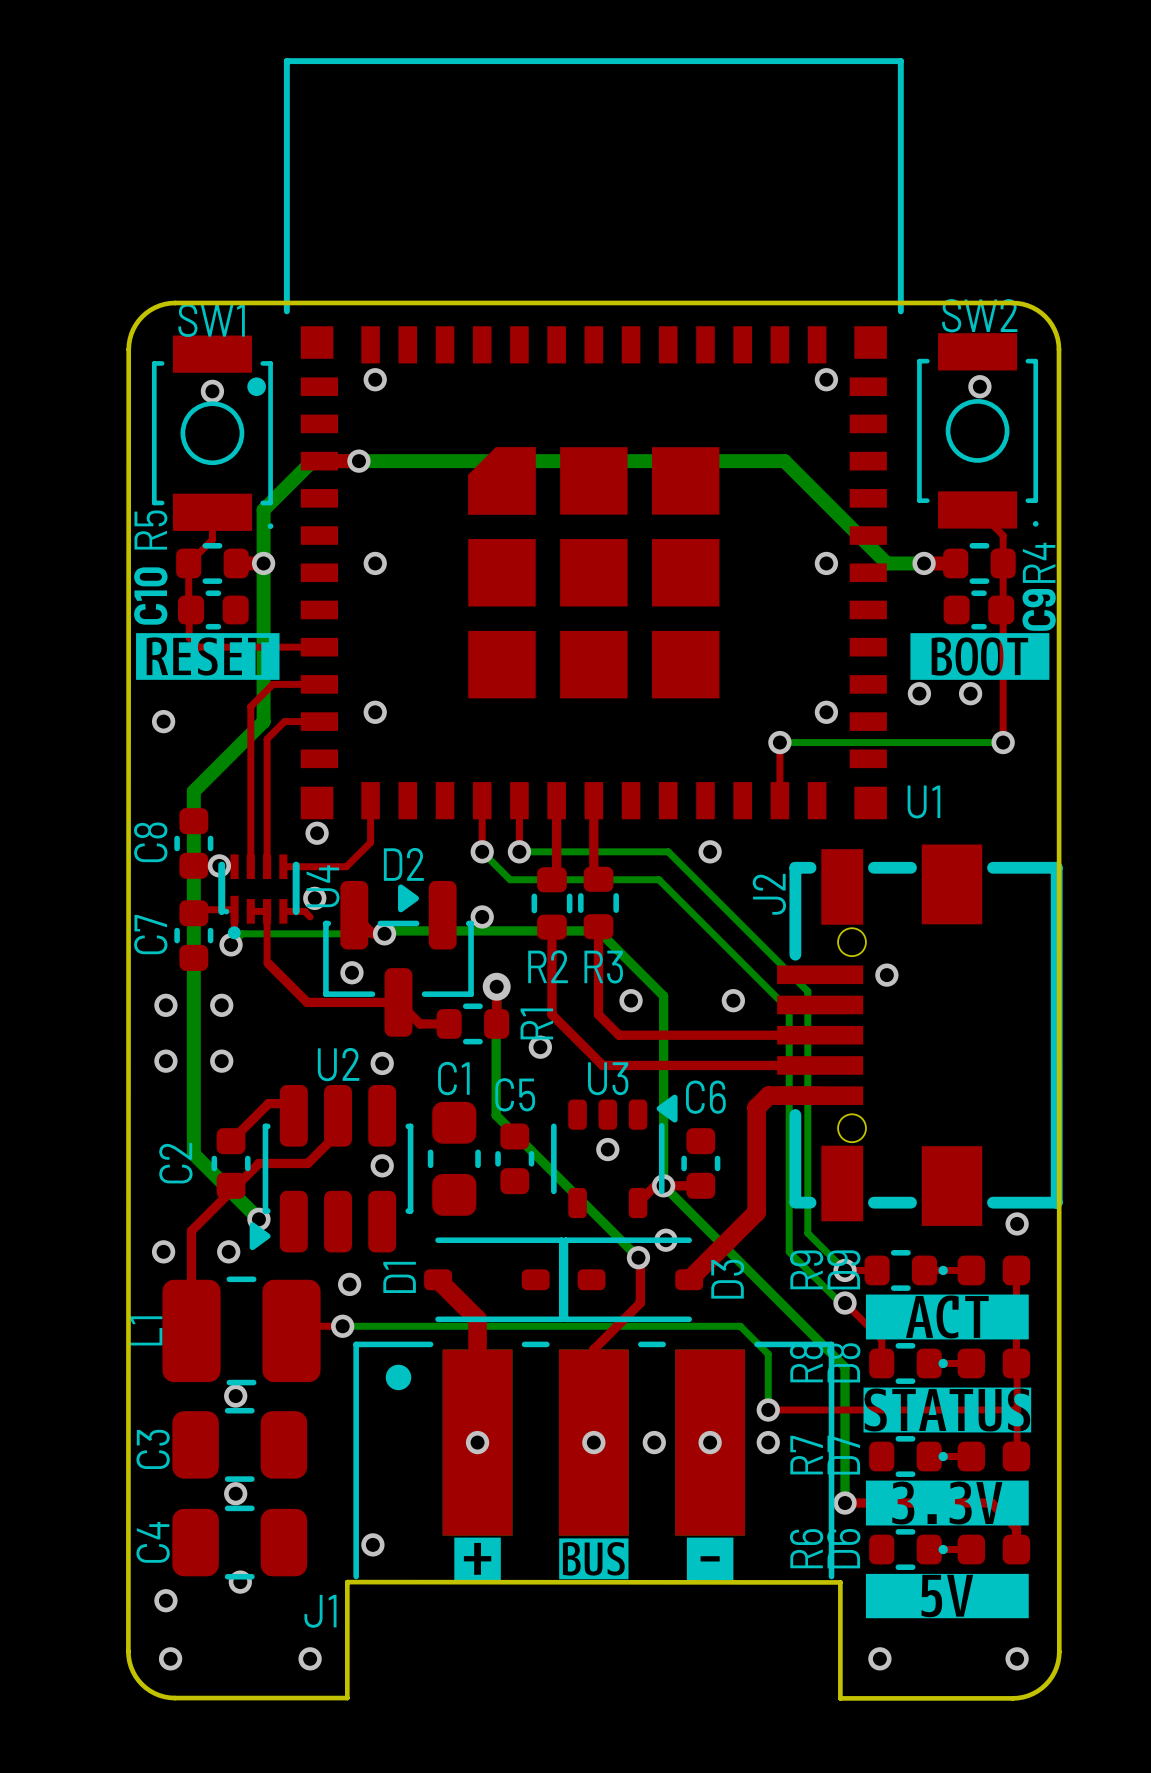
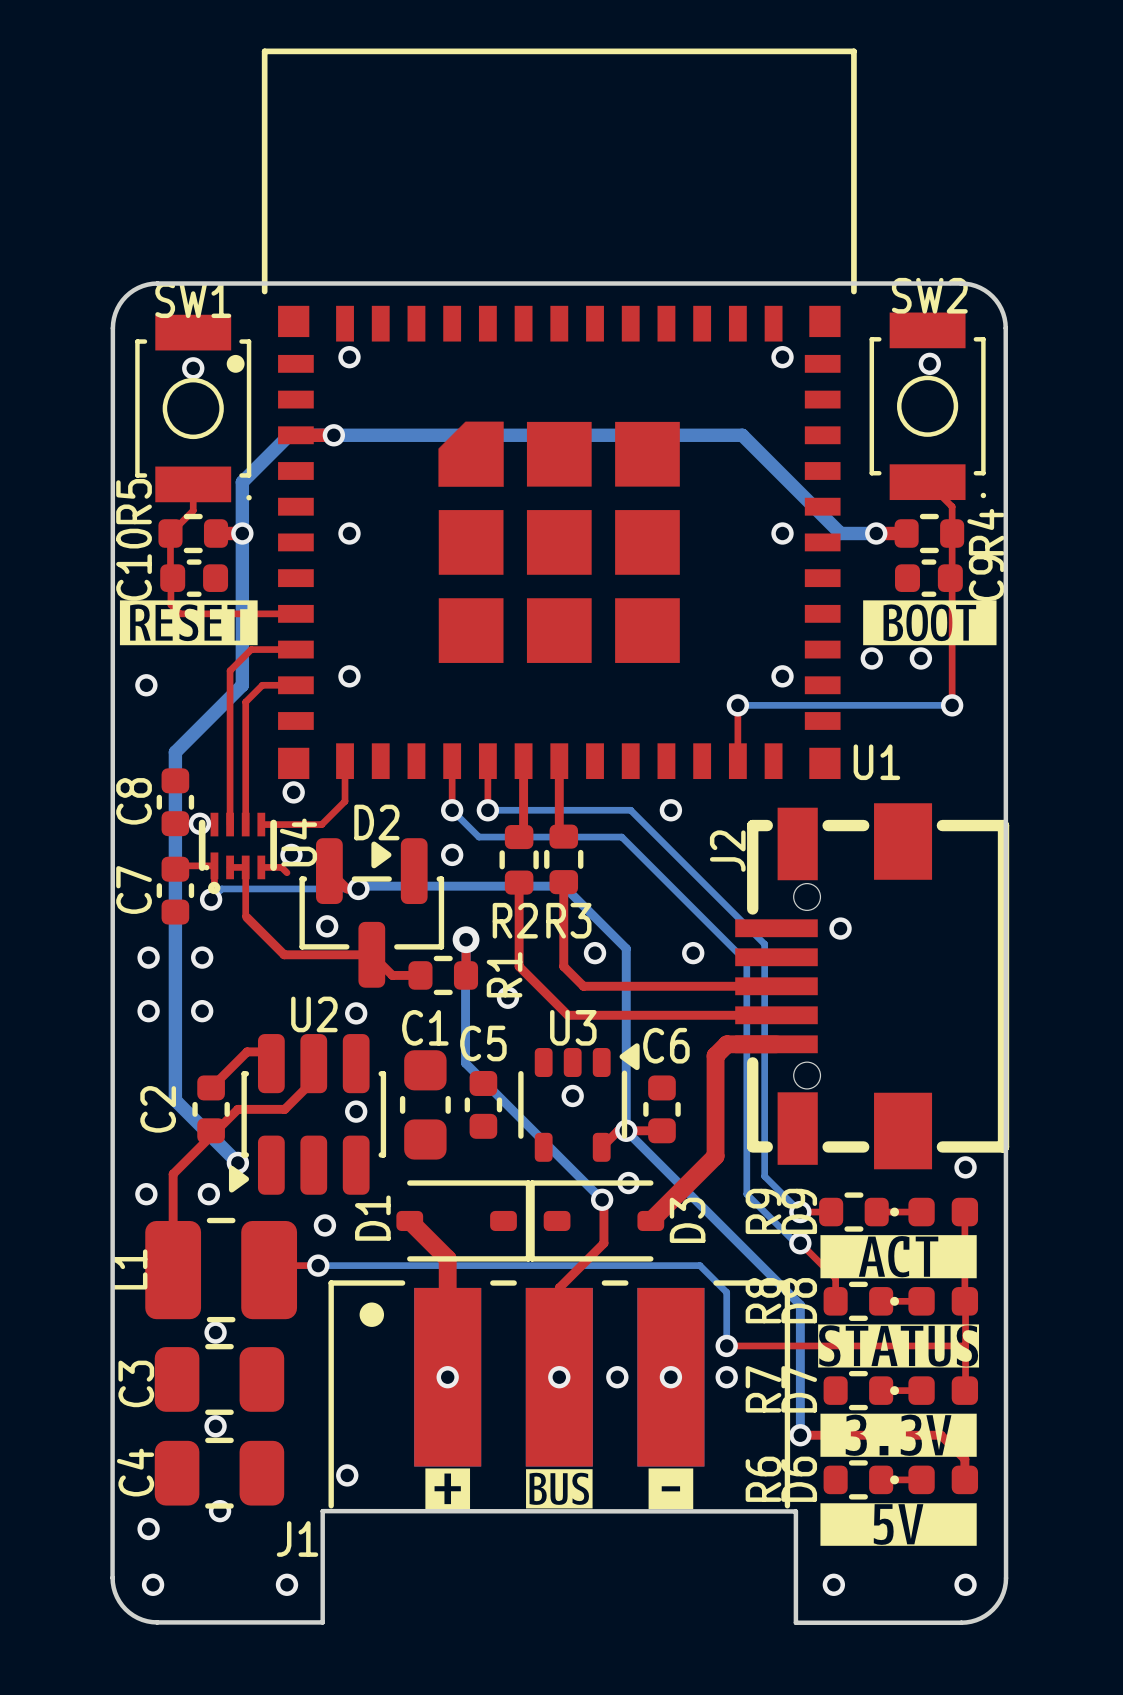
via position: (482, 916) -> (452, 854)

